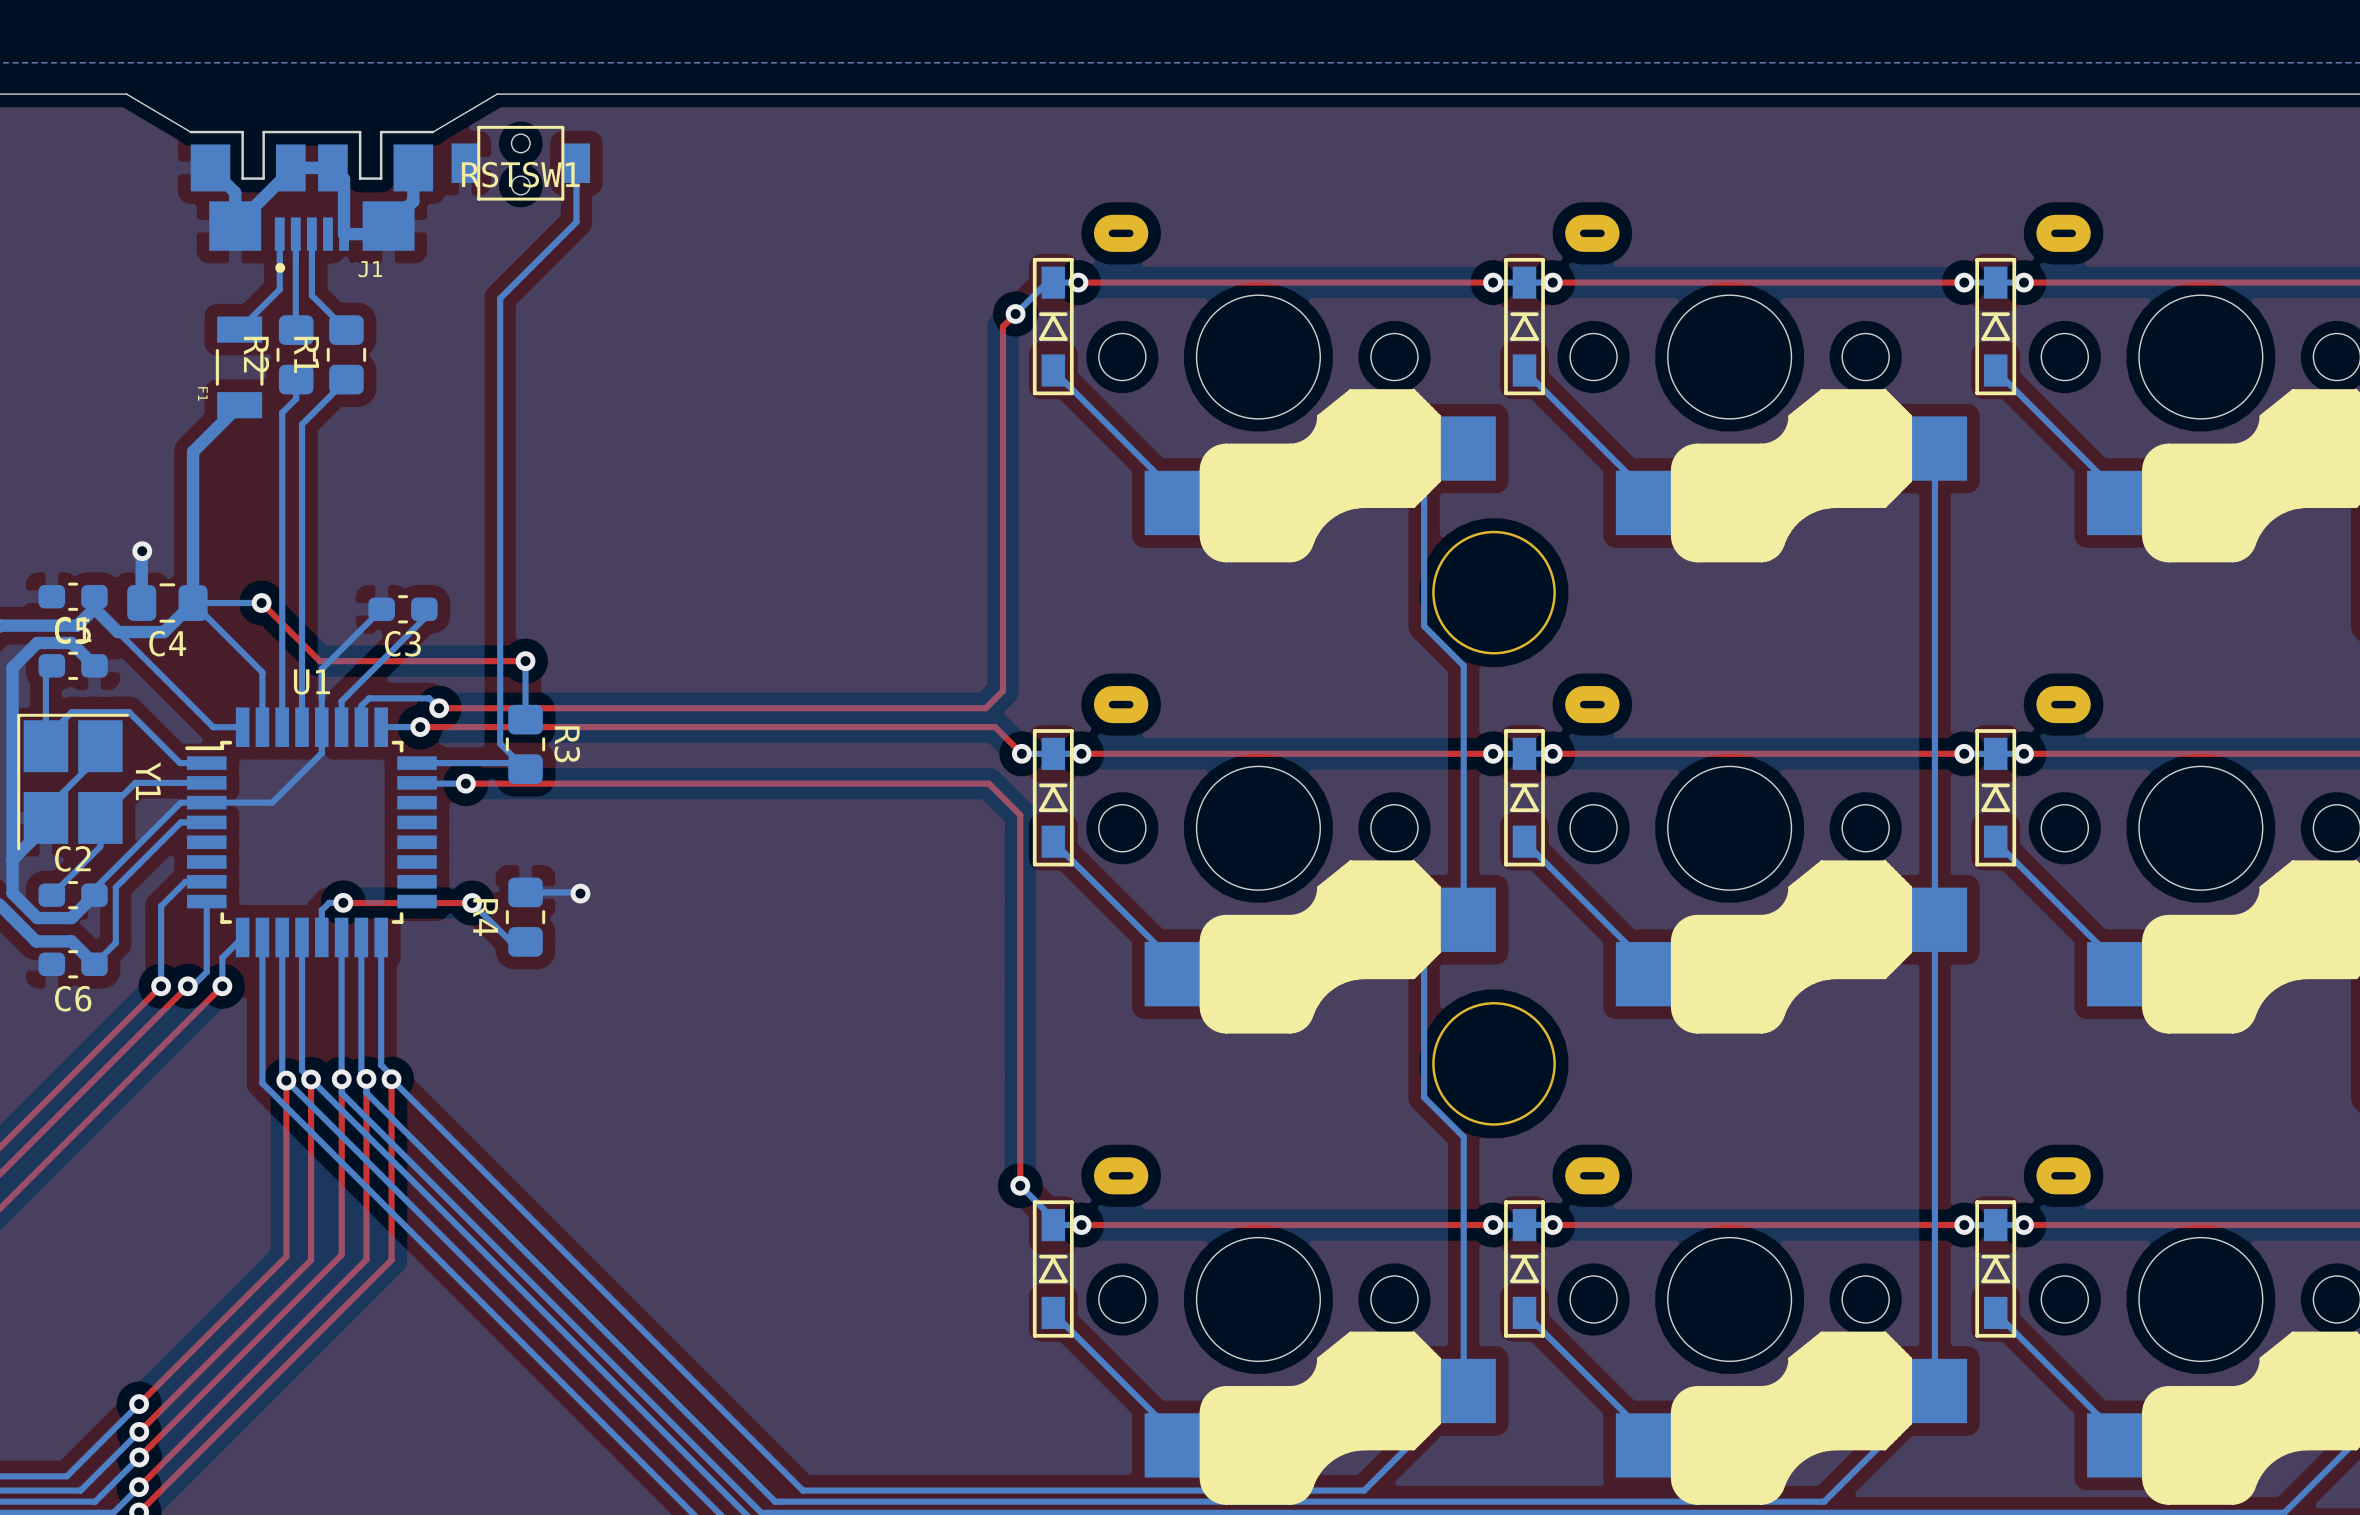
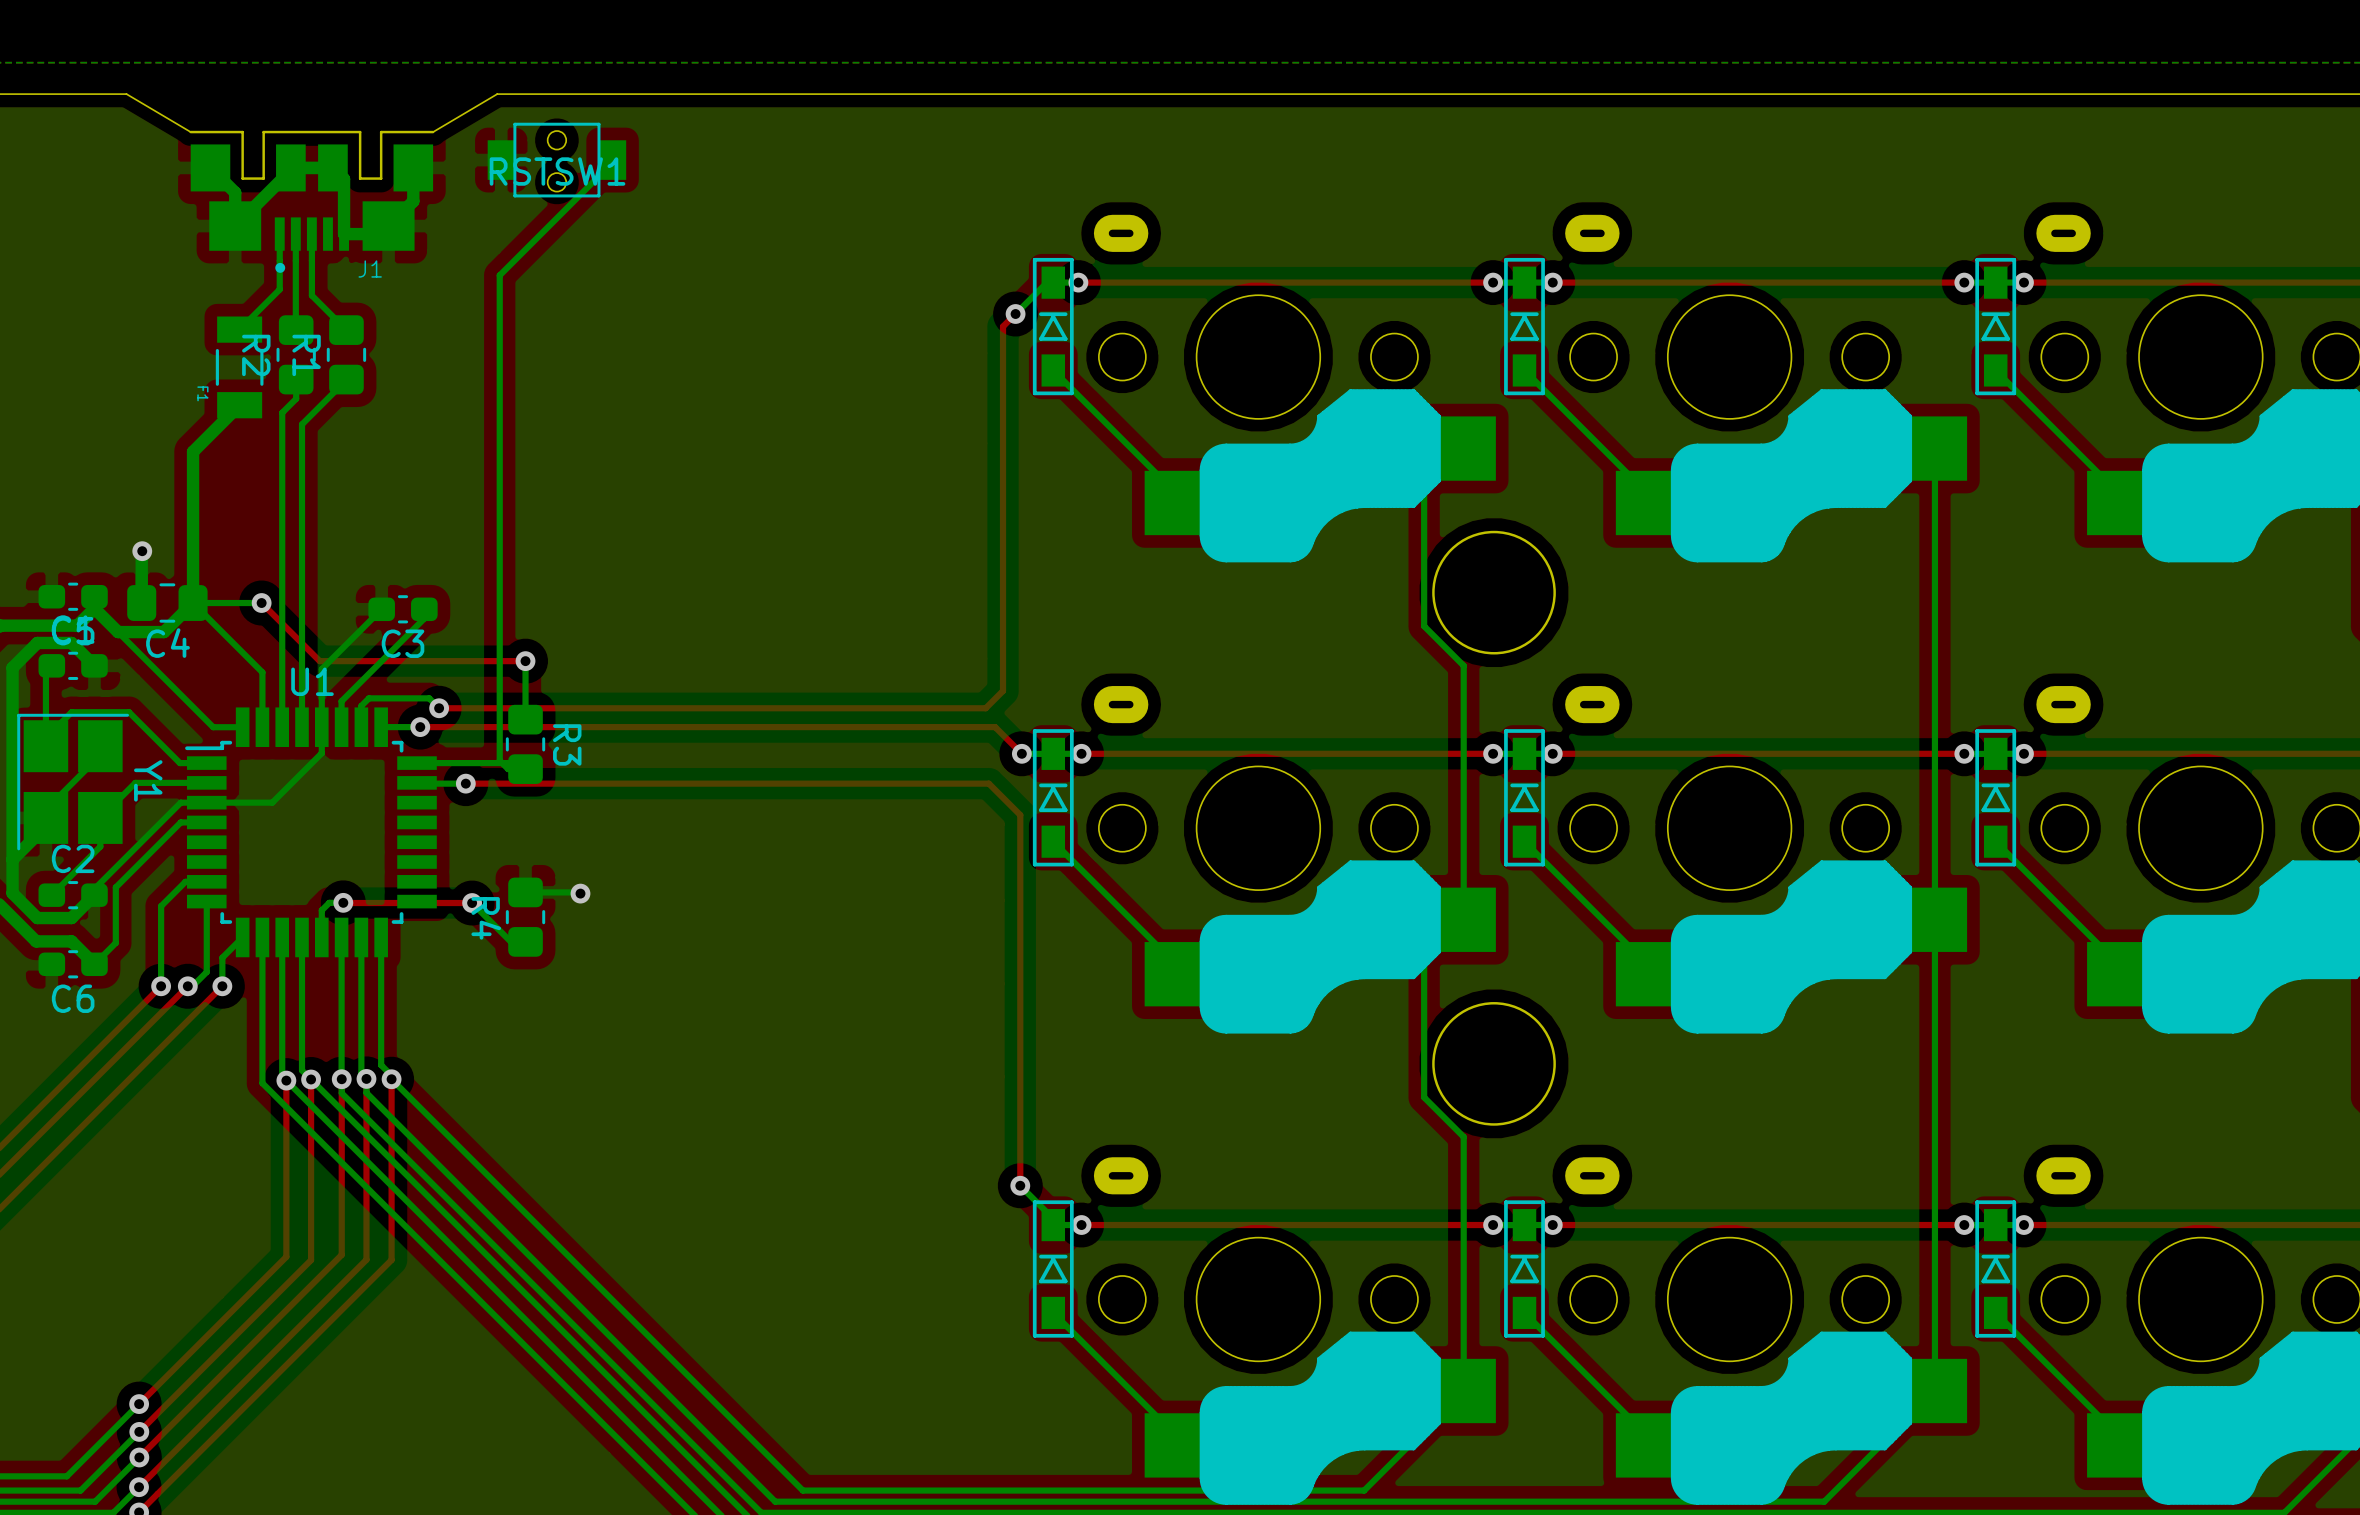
bottom track: none -> (612, 150) (612, 162) (499, 275) (499, 760) (508, 769) (525, 769)
RSTSW1 position: (520, 163) -> (556, 160)
bottom track: (576, 163) (576, 222) (500, 298) (500, 743) (519, 763) -> none

